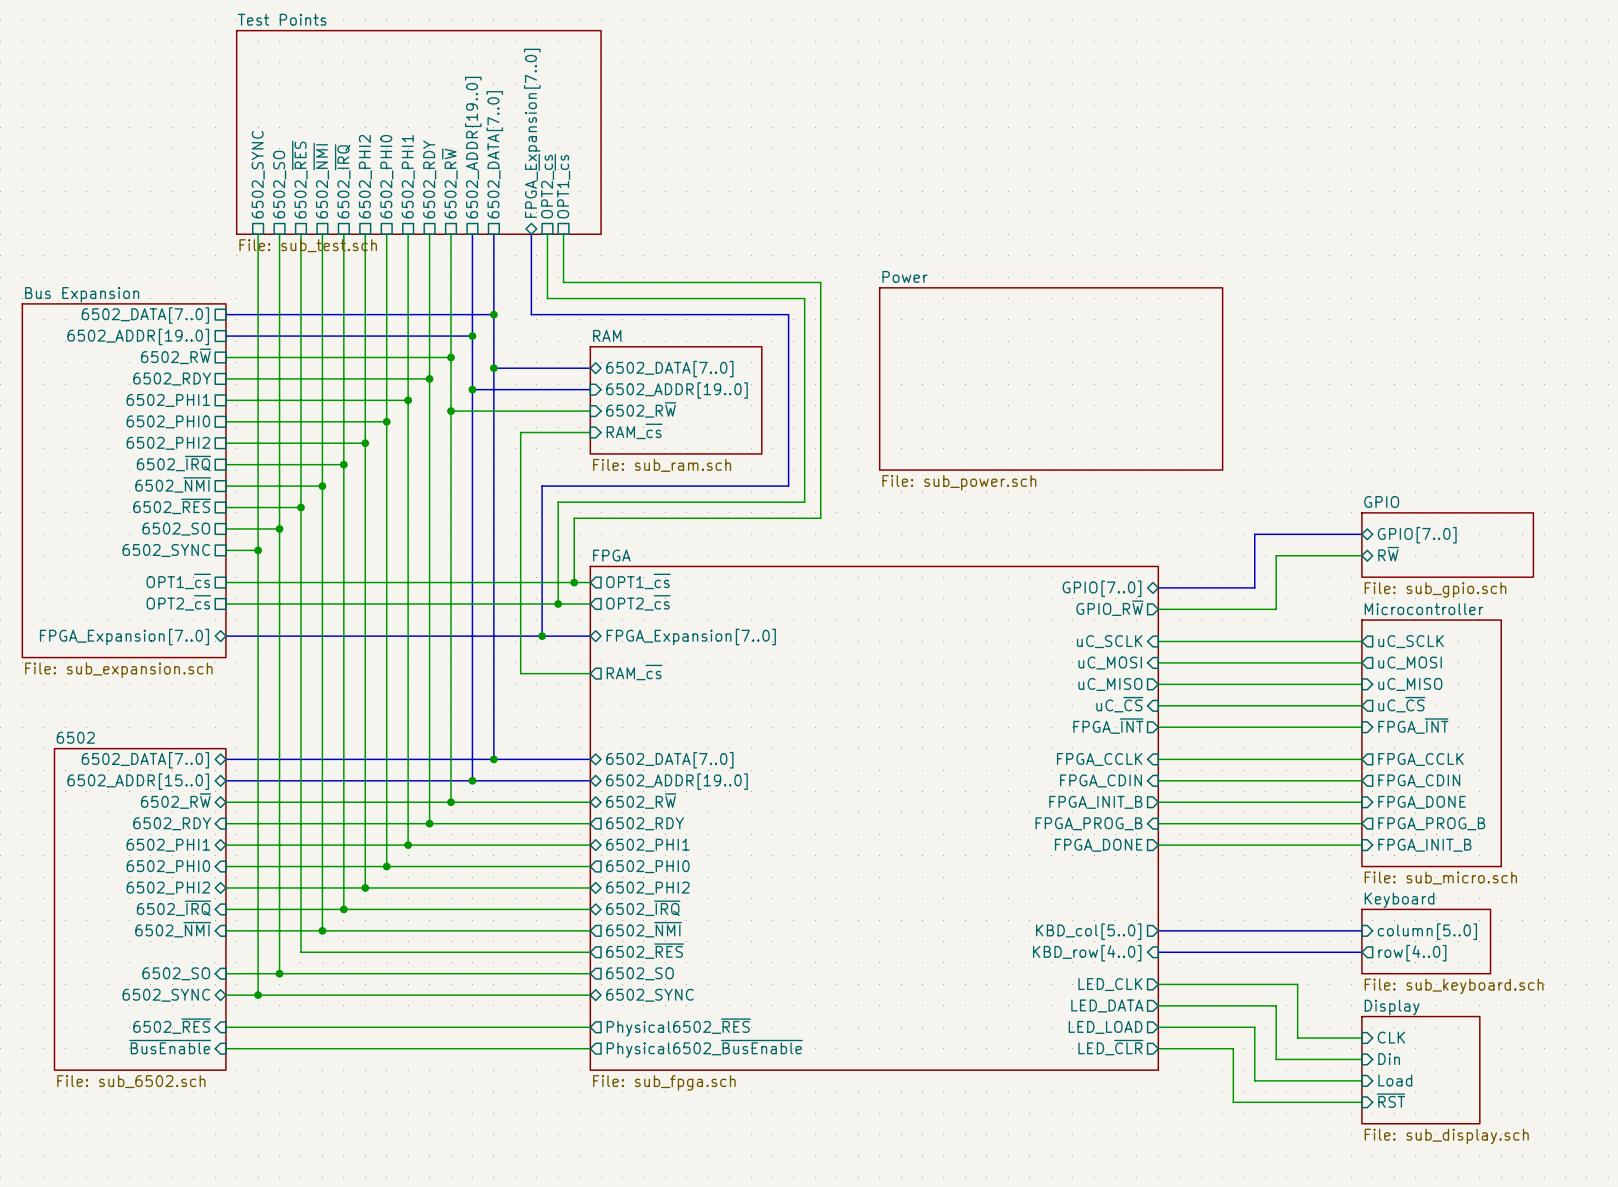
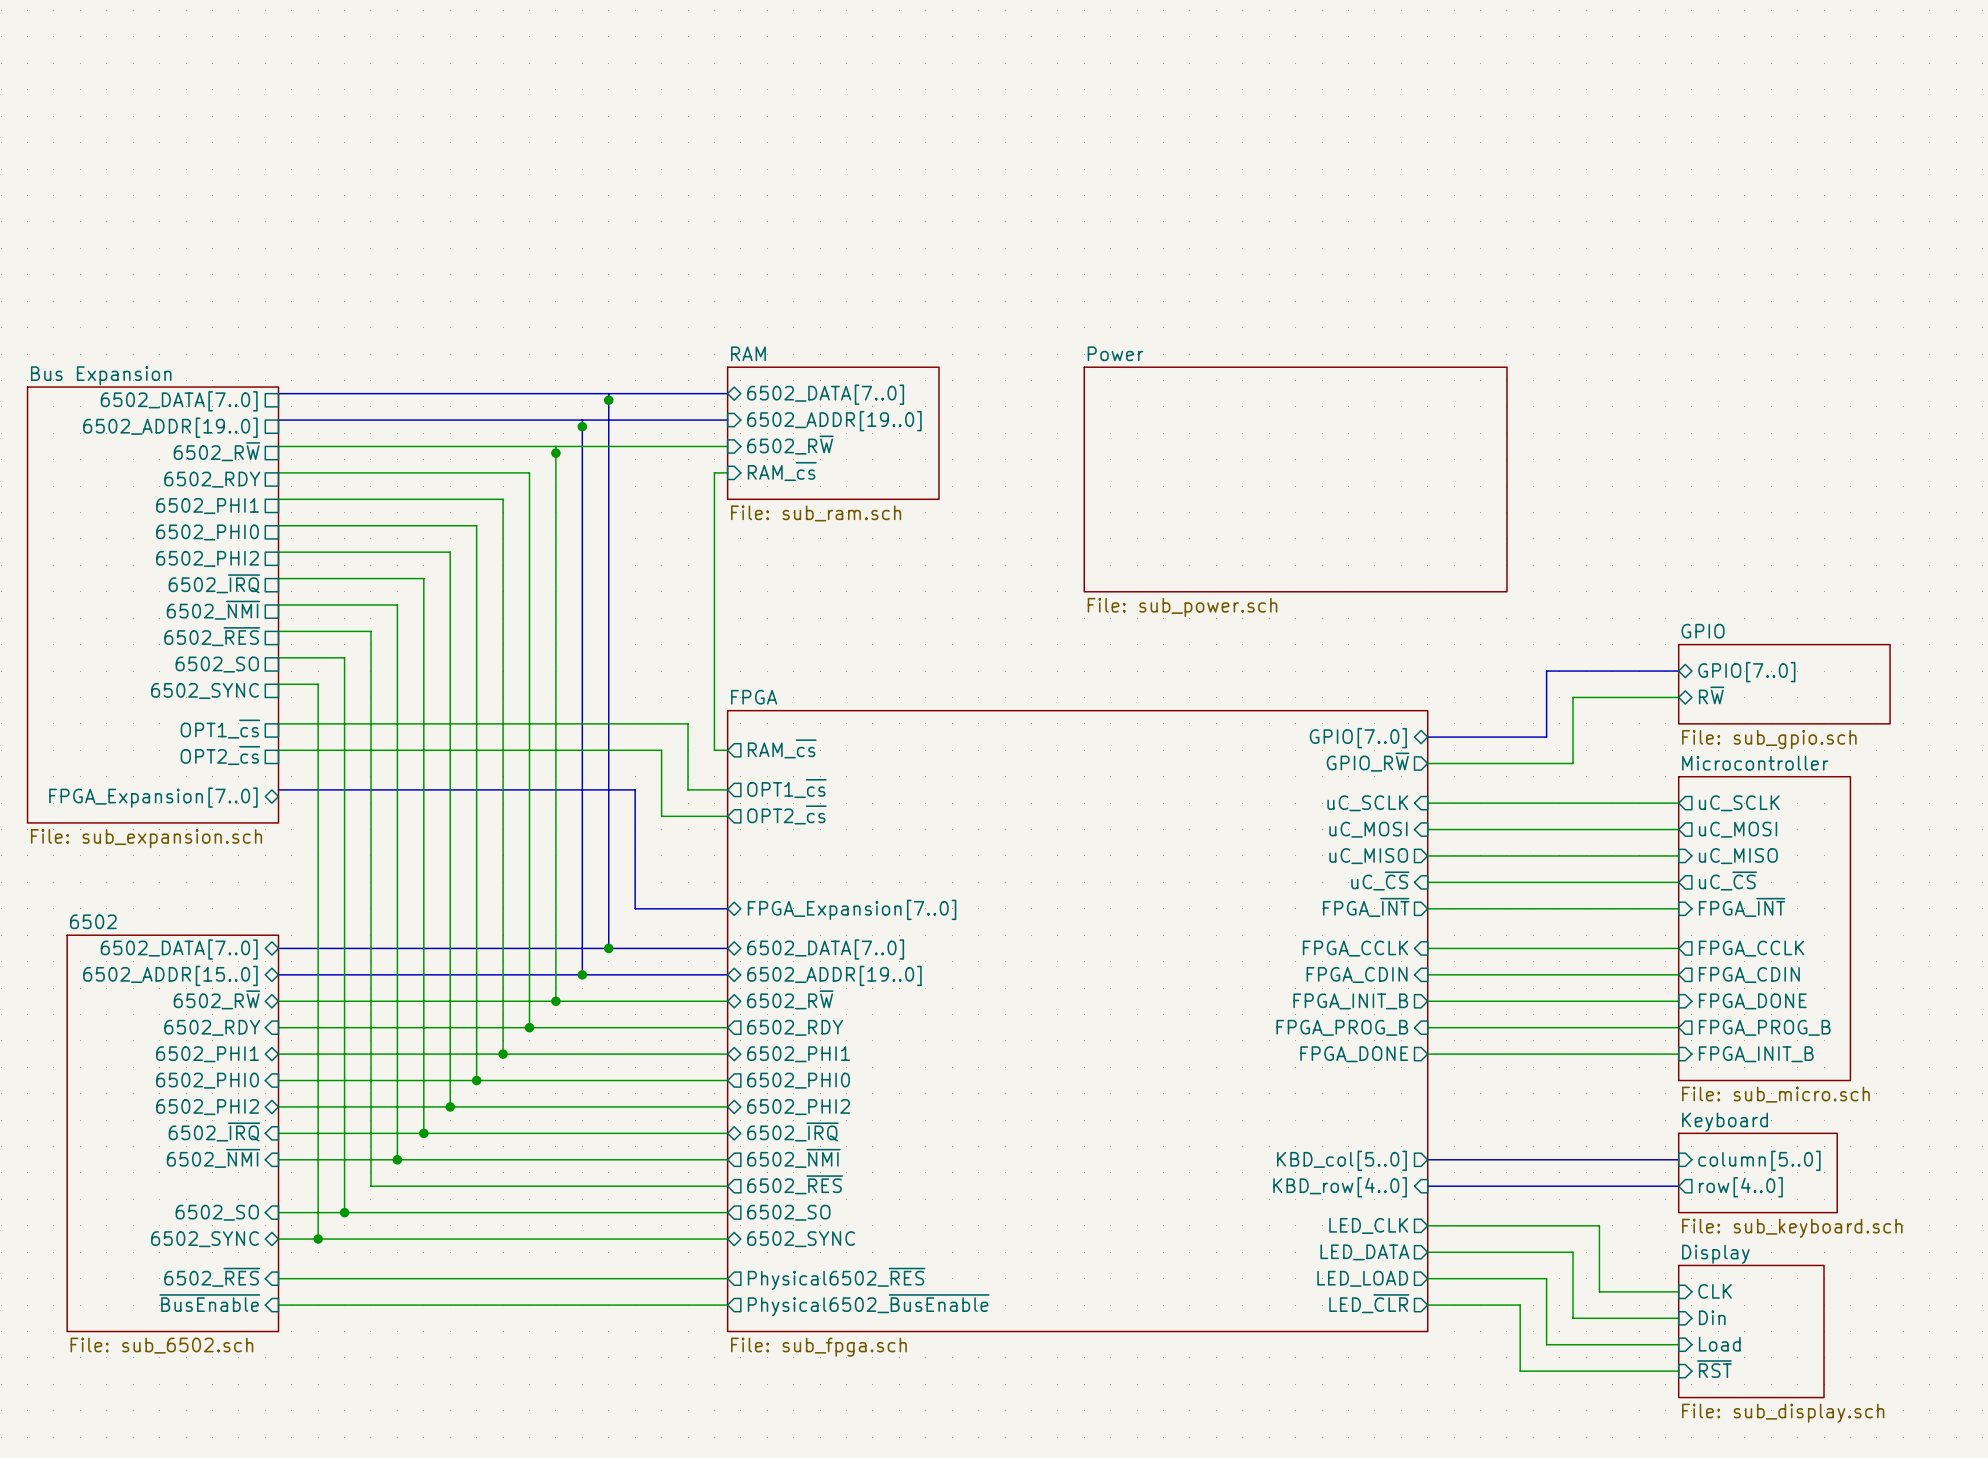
sheet Test Points: File: sub_test.sch (418, 132) -> none
sheet pin: FPGA_Expansion[7..0] (532, 133) -> none
sheet pin: 6502_ADDR[19..0] (473, 147) -> none
sheet pin: 6502_DATA[7..0] (494, 154) -> none
sheet pin: 6502_SYNC (258, 174) -> none
sheet pin: 6502_PHI2 (365, 176) -> none
sheet pin: 6502_PHI0 (386, 176) -> none
sheet pin: 6502_PHI1 (408, 176) -> none
sheet pin: 6502_~{RES} (299, 179) -> none
sheet pin: 6502_RDY (429, 179) -> none
sheet pin: 6502_~{NMI} (321, 180) -> none
sheet pin: 6502_~{IRQ} (342, 181) -> none
sheet pin: 6502_R~{W} (449, 183) -> none
sheet pin: 6502_SO (279, 184) -> none
sheet pin: OPT2_~{cs} (546, 186) -> none
sheet pin: OPT1_~{cs} (562, 186) -> none
wire: (258, 234) (258, 545) -> (278, 684) (318, 684)
wire: (279, 234) (279, 523) -> (278, 657) (344, 657)
wire: (300, 234) (300, 502) -> (278, 631) (370, 631)
wire: (322, 234) (322, 480) -> (278, 604) (397, 604)
wire: (343, 234) (343, 459) -> (278, 578) (423, 578)
wire: (365, 234) (365, 437) -> (278, 552) (450, 552)
wire: (386, 234) (386, 416) -> (278, 525) (476, 525)
wire: (408, 234) (408, 395) -> (278, 499) (503, 499)
wire: (429, 234) (429, 373) -> (278, 472) (529, 472)
wire: (451, 234) (451, 352) -> none
bus: (472, 234) (472, 330) -> none
bus: (493, 234) (493, 309) -> none
bus: (531, 234) (531, 314) (788, 314) (788, 486) (542, 486) (542, 636) -> none
wire: (547, 234) (547, 298) (804, 298) (804, 502) (558, 502) (558, 577) -> (278, 723) (688, 723)
wire: (563, 234) (563, 282) (820, 282) (820, 518) (574, 518) (574, 582) -> none
bus: none -> (278, 393) (727, 393)
bus: (225, 314) (493, 314) -> none
bus: none -> (278, 420) (727, 420)
bus: (225, 336) (472, 336) -> none
wire: none -> (278, 446) (727, 446)
wire: (225, 357) (451, 357) -> none
bus: (493, 368) (590, 368) -> none
junction: (493, 368) -> none
sheet pin position: 6502_DATA[7..0] (669, 369) -> 6502_DATA[7..0] (825, 394)
wire: none -> (727, 472) (714, 472) (714, 750) (727, 750)
wire: (225, 378) (429, 378) -> none
junction: (429, 378) -> none
bus: (472, 389) (590, 389) -> none
junction: (472, 389) -> none
sheet pin position: 6502_ADDR[19..0] (676, 390) -> 6502_ADDR[19..0] (834, 421)
wire: (225, 400) (408, 400) -> none
junction: (408, 400) -> none
sheet RAM position: (676, 400) -> (833, 433)
sheet pin position: 6502_R~{W} (641, 409) -> 6502_R~{W} (790, 445)
wire: (451, 411) (590, 411) -> none
junction: (451, 411) -> none
wire: (225, 421) (386, 421) -> none
junction: (386, 421) -> none
sheet pin position: RAM_~{cs} (634, 431) -> RAM_~{cs} (782, 471)
wire: (590, 432) (520, 432) (520, 673) (590, 673) -> none
wire: (225, 443) (365, 443) -> none
junction: (365, 443) -> none
wire: (225, 464) (343, 464) -> none
junction: (343, 464) -> none
wire: (225, 486) (322, 486) -> none
junction: (322, 486) -> none
wire: (225, 507) (300, 507) -> none
junction: (300, 507) -> none
wire: (225, 528) (279, 528) -> none
junction: (279, 528) -> none
wire: (225, 550) (258, 550) -> none
junction: (258, 550) -> none
sheet pin position: OPT1_~{cs} (638, 581) -> OPT1_~{cs} (786, 788)
wire: (225, 582) (590, 582) -> none
junction: (574, 582) -> none
wire: none -> (278, 750) (661, 750) (661, 816) (727, 816)
sheet pin position: OPT2_~{cs} (638, 602) -> OPT2_~{cs} (786, 814)
wire: (225, 603) (590, 603) -> none
wire: none -> (688, 756) (688, 789) (727, 789)
junction: (558, 603) -> none
bus: none -> (278, 789) (635, 789) (635, 908) (727, 908)
bus: (225, 636) (590, 636) -> none
junction: (542, 636) -> none
sheet pin position: FPGA_Expansion[7..0] (691, 637) -> FPGA_Expansion[7..0] (852, 909)
sheet pin position: RAM_~{cs} (634, 672) -> RAM_~{cs} (782, 748)

